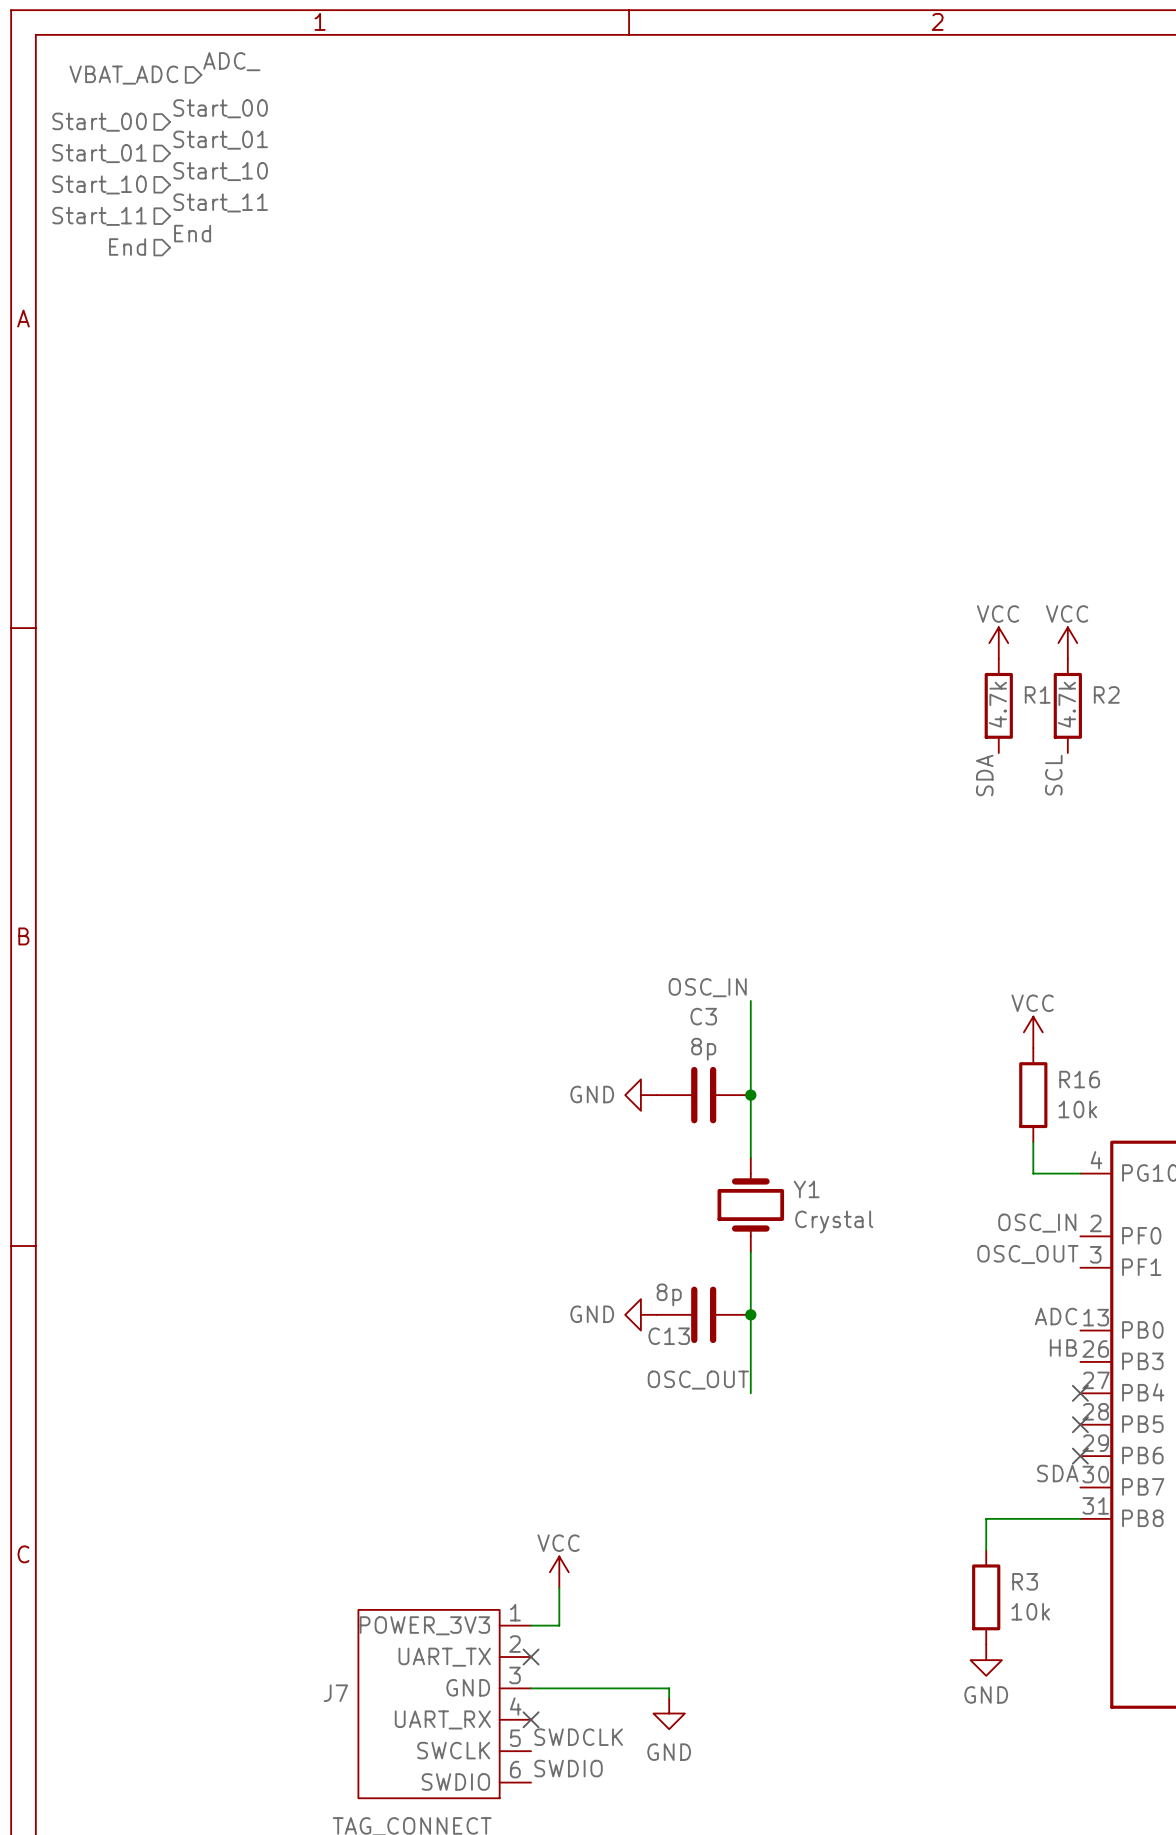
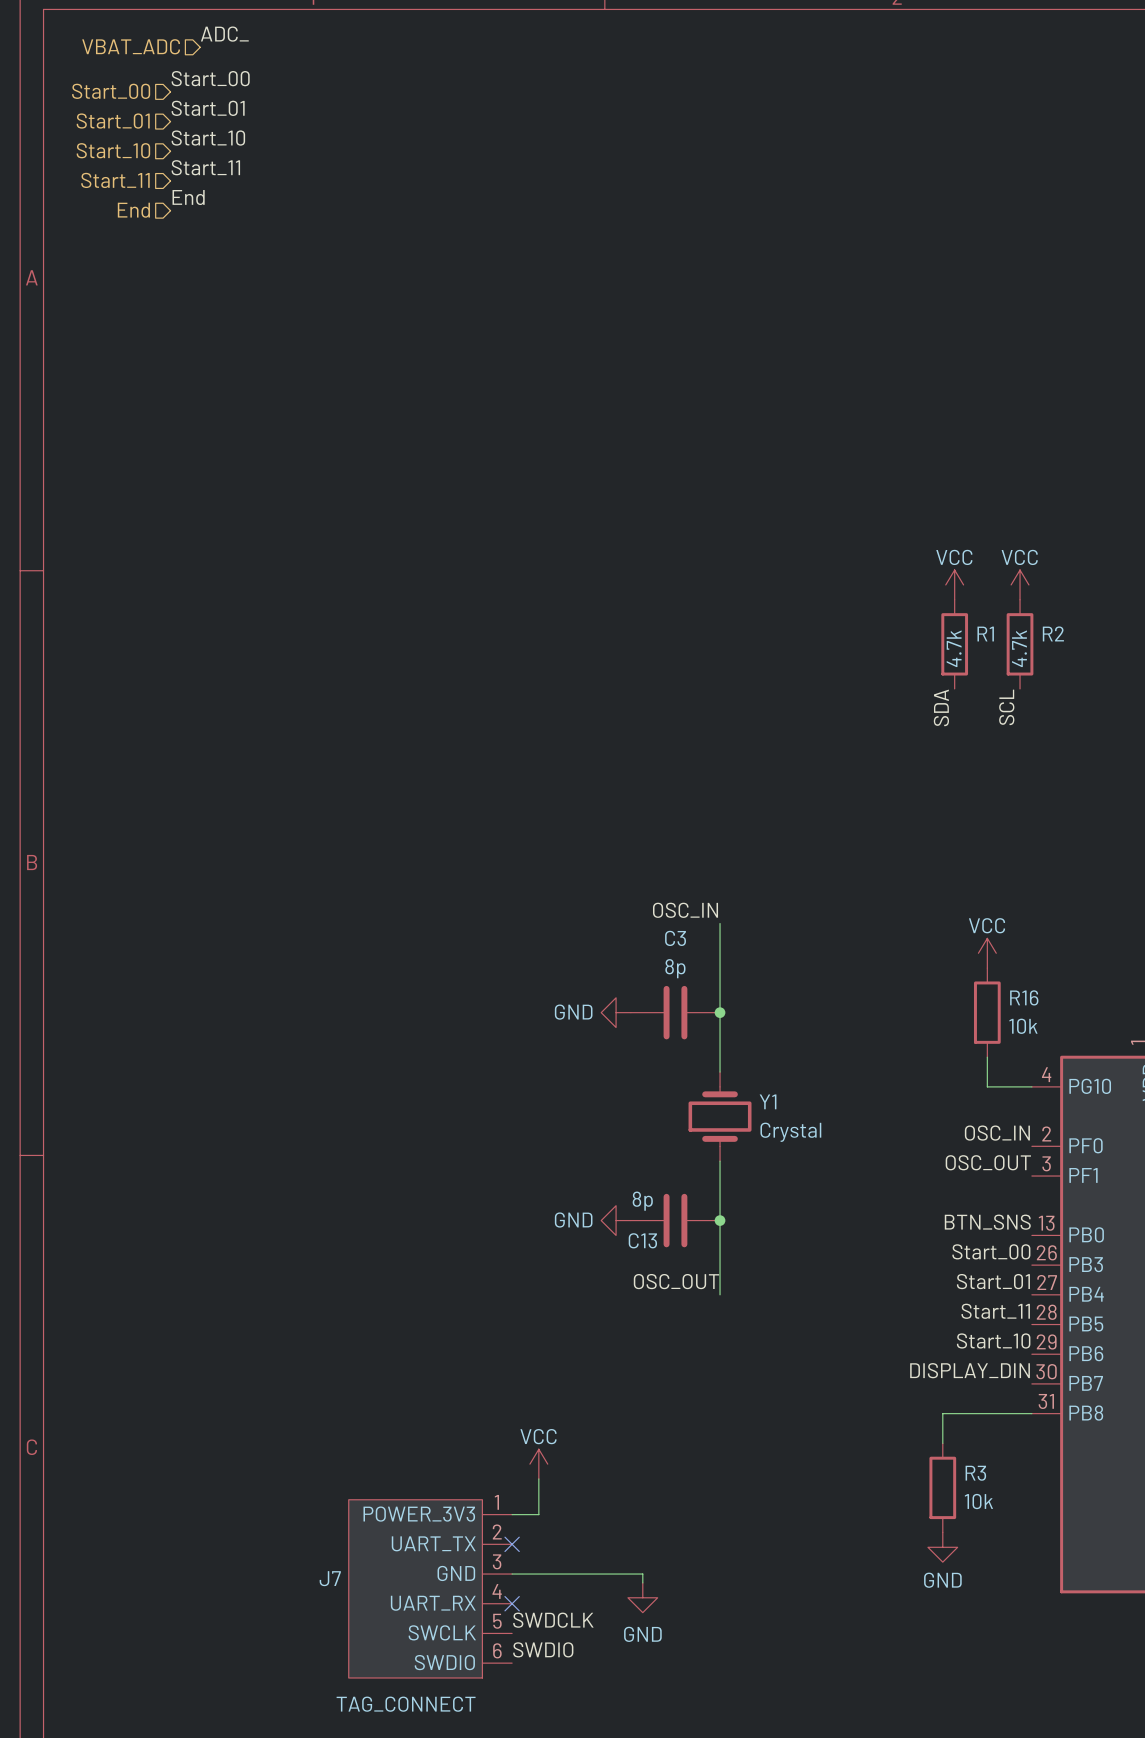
label: ADC (1055, 1316) -> BTN_SNS (987, 1222)
label: HB (1063, 1347) -> Start_00 (991, 1251)
label: none -> Start_01 (993, 1281)
no-connect mark: (1080, 1393) -> none
label: none -> Start_11 (995, 1311)
no-connect mark: (1080, 1424) -> none
label: none -> Start_10 (993, 1340)
no-connect mark: (1080, 1456) -> none
label: SDA (1057, 1473) -> DISPLAY_DIN (970, 1370)

